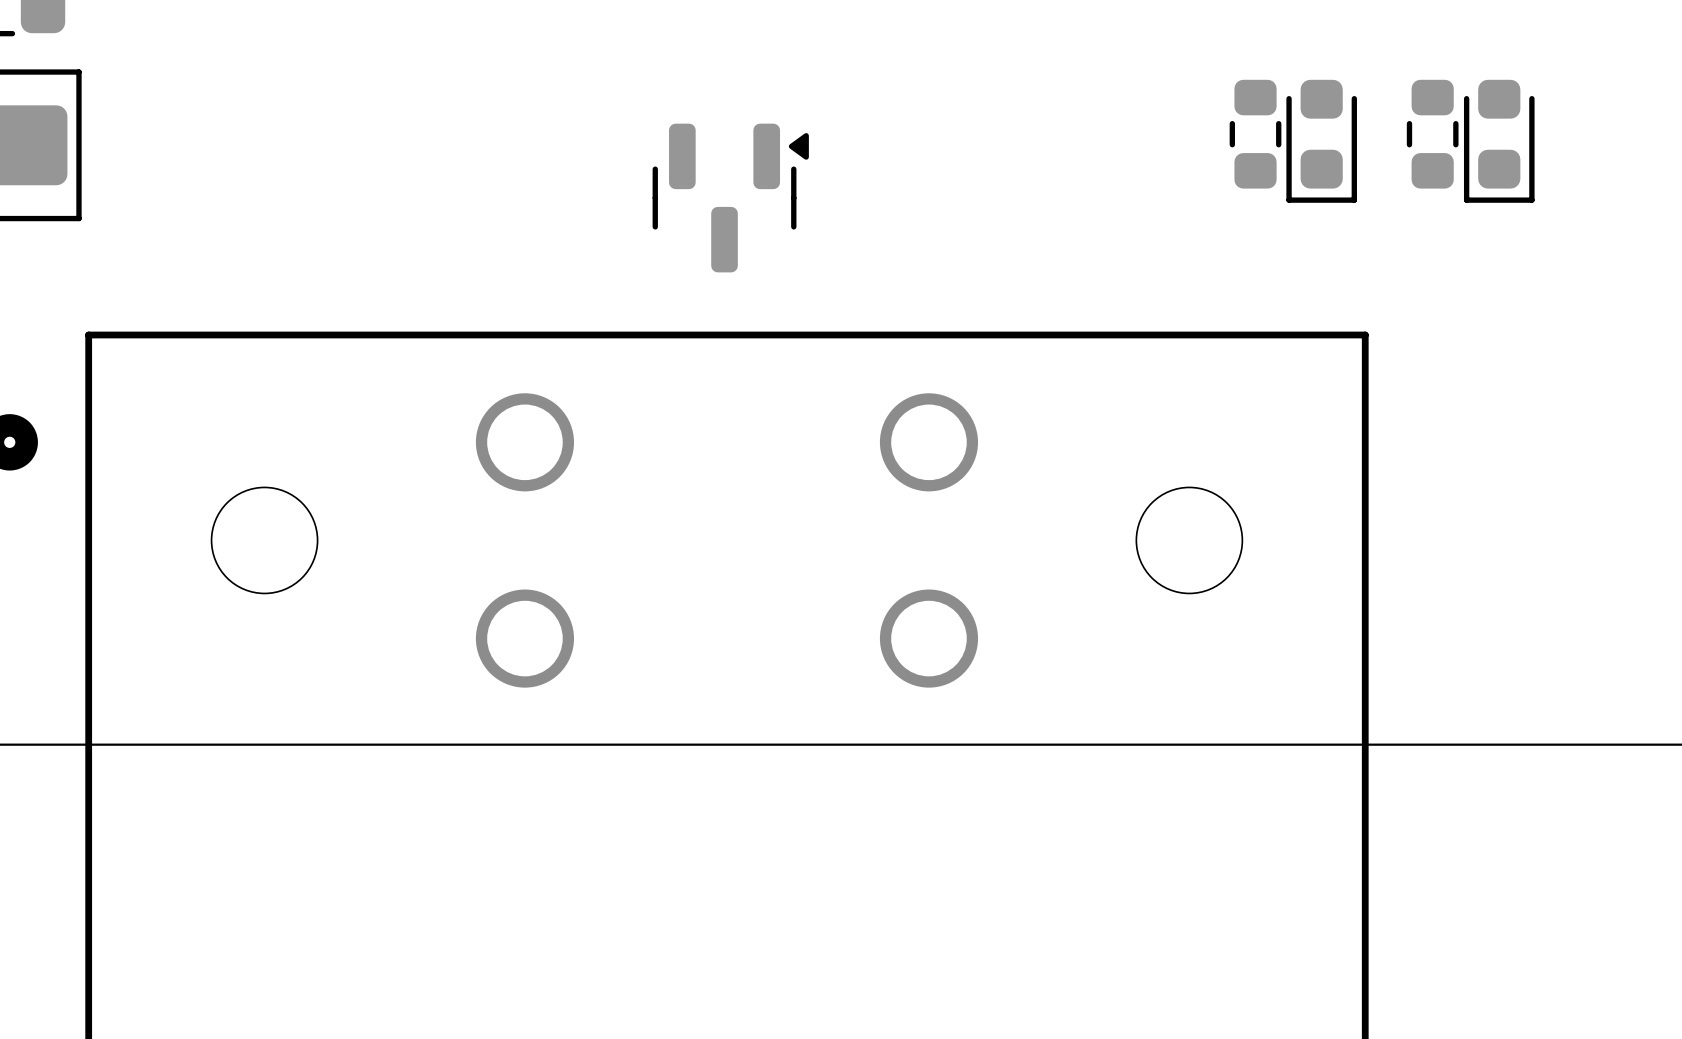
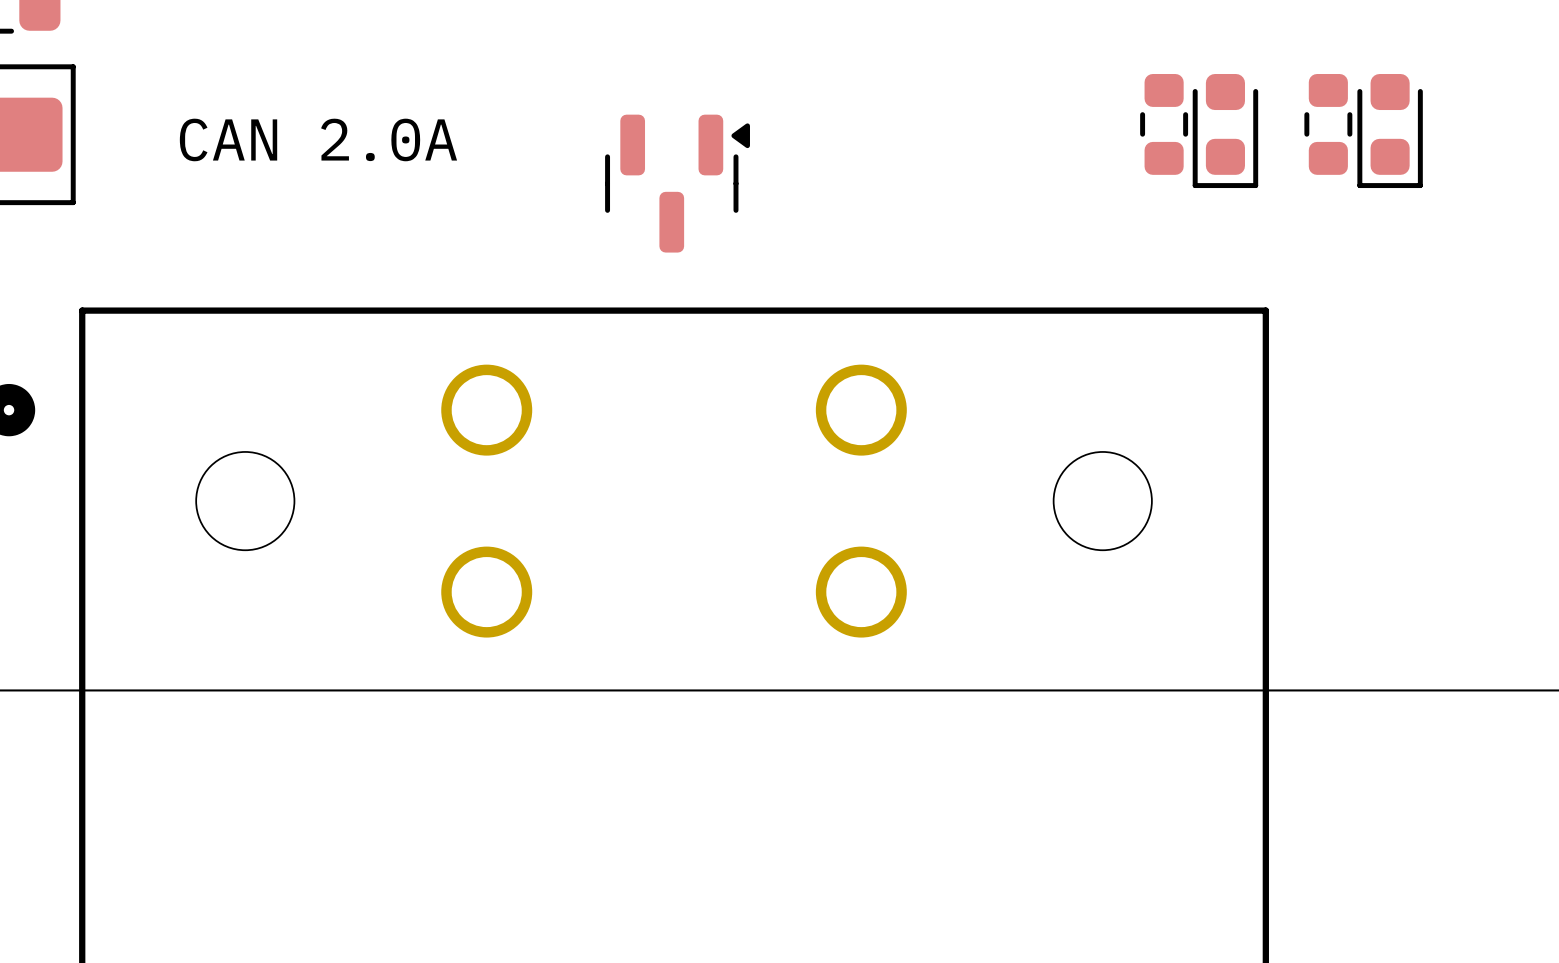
text: none -> CAN 2.0A (318, 139)

